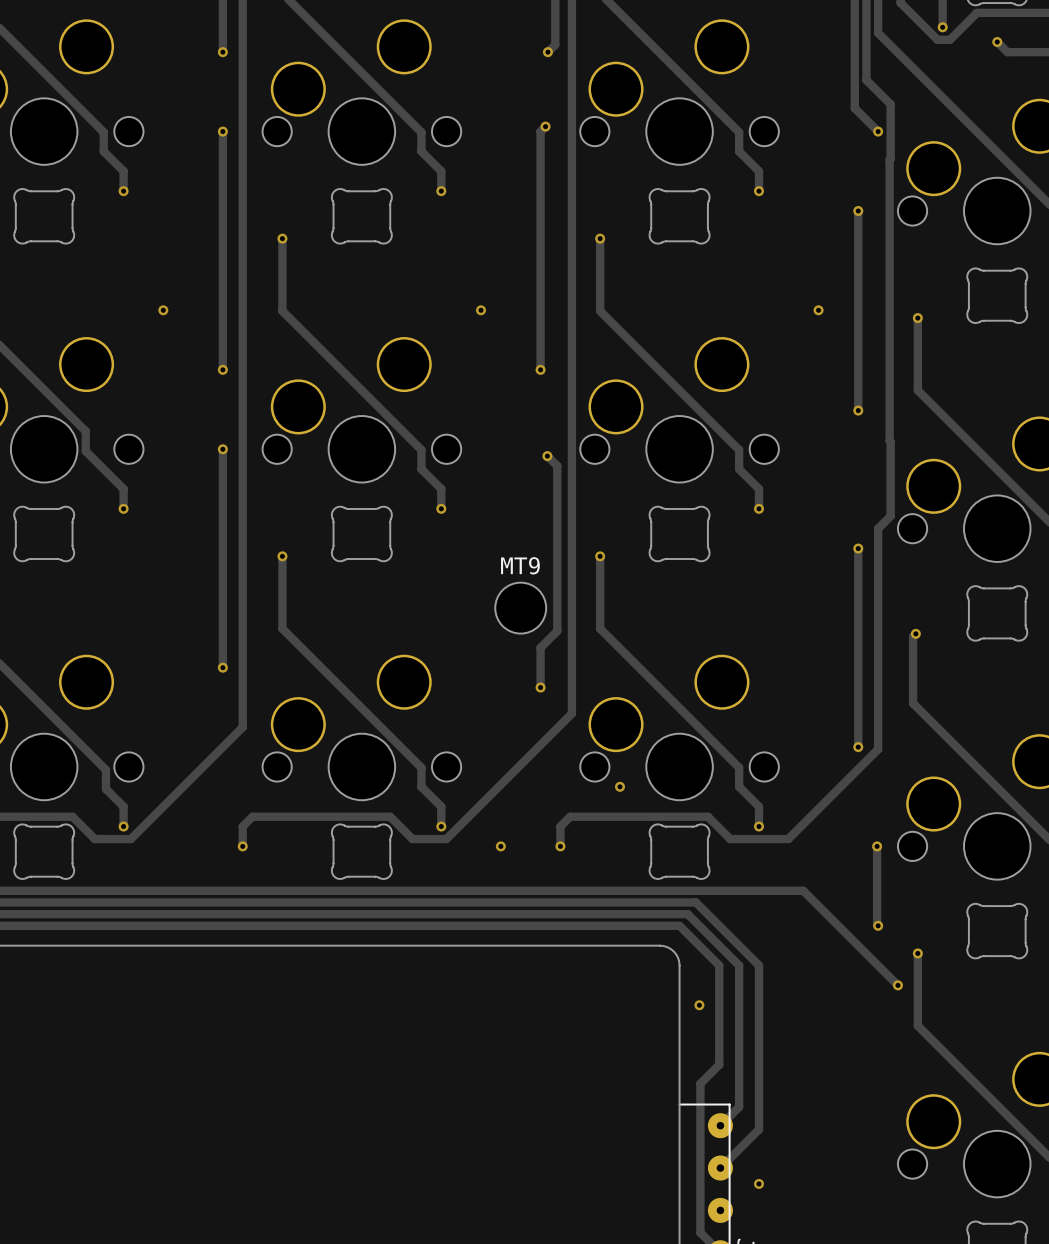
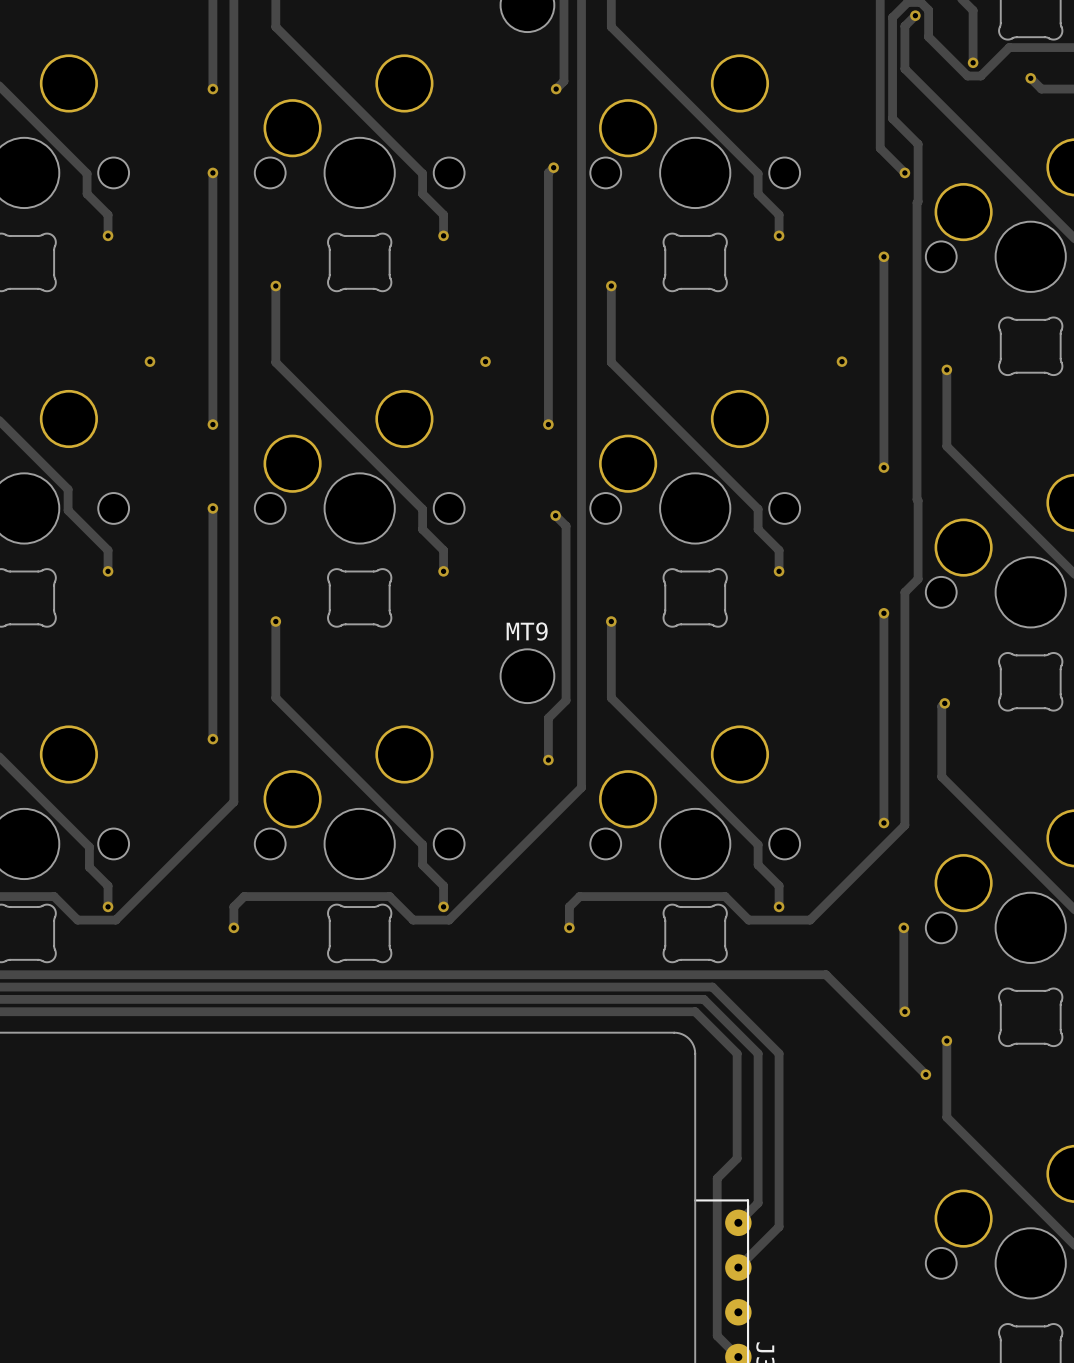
via: (620, 786) -> none
via: (500, 846) -> none
via: (699, 1005) -> none
via: (758, 1183) -> none

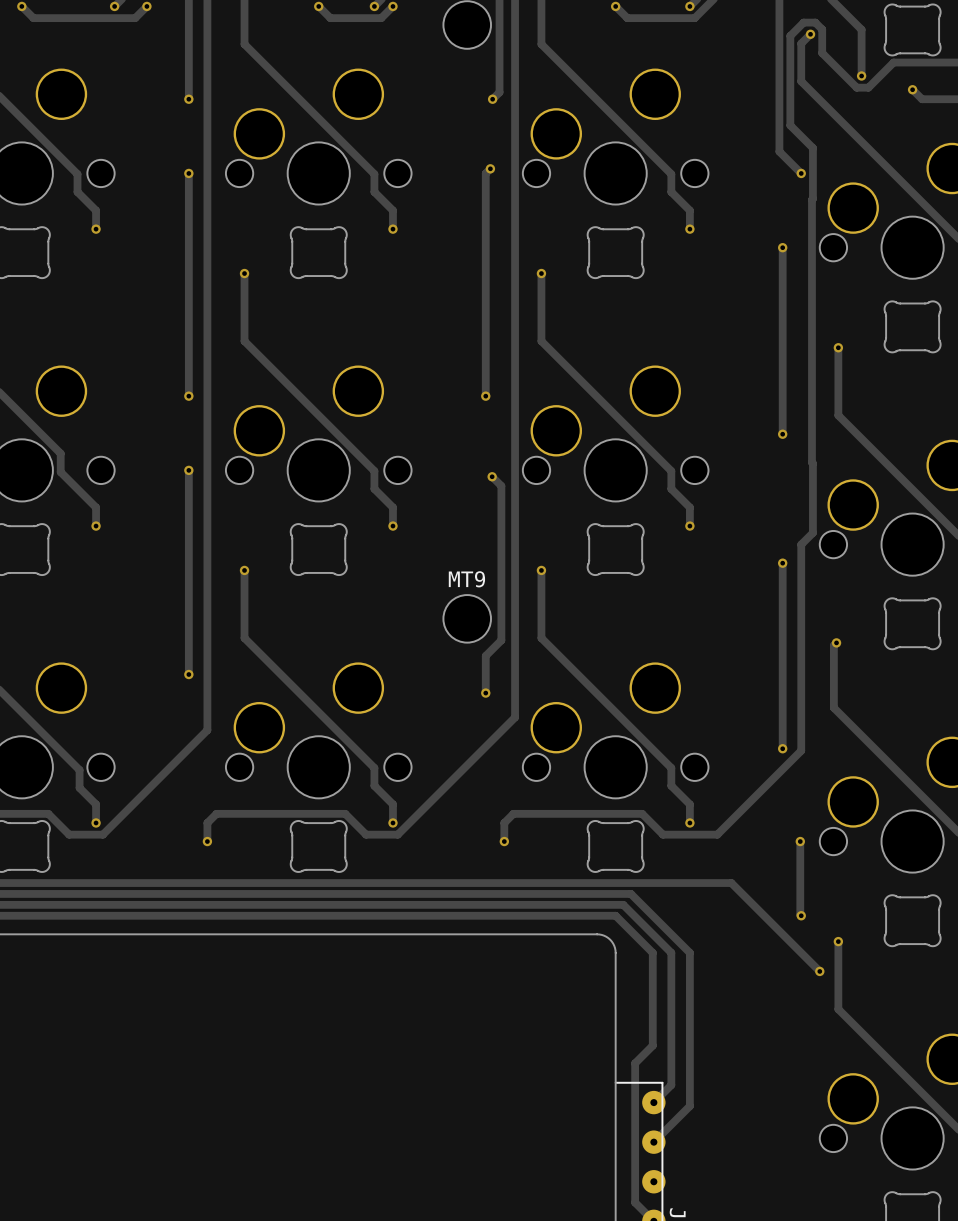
via: (149, 361) -> none
via: (485, 361) -> none
via: (841, 361) -> none

